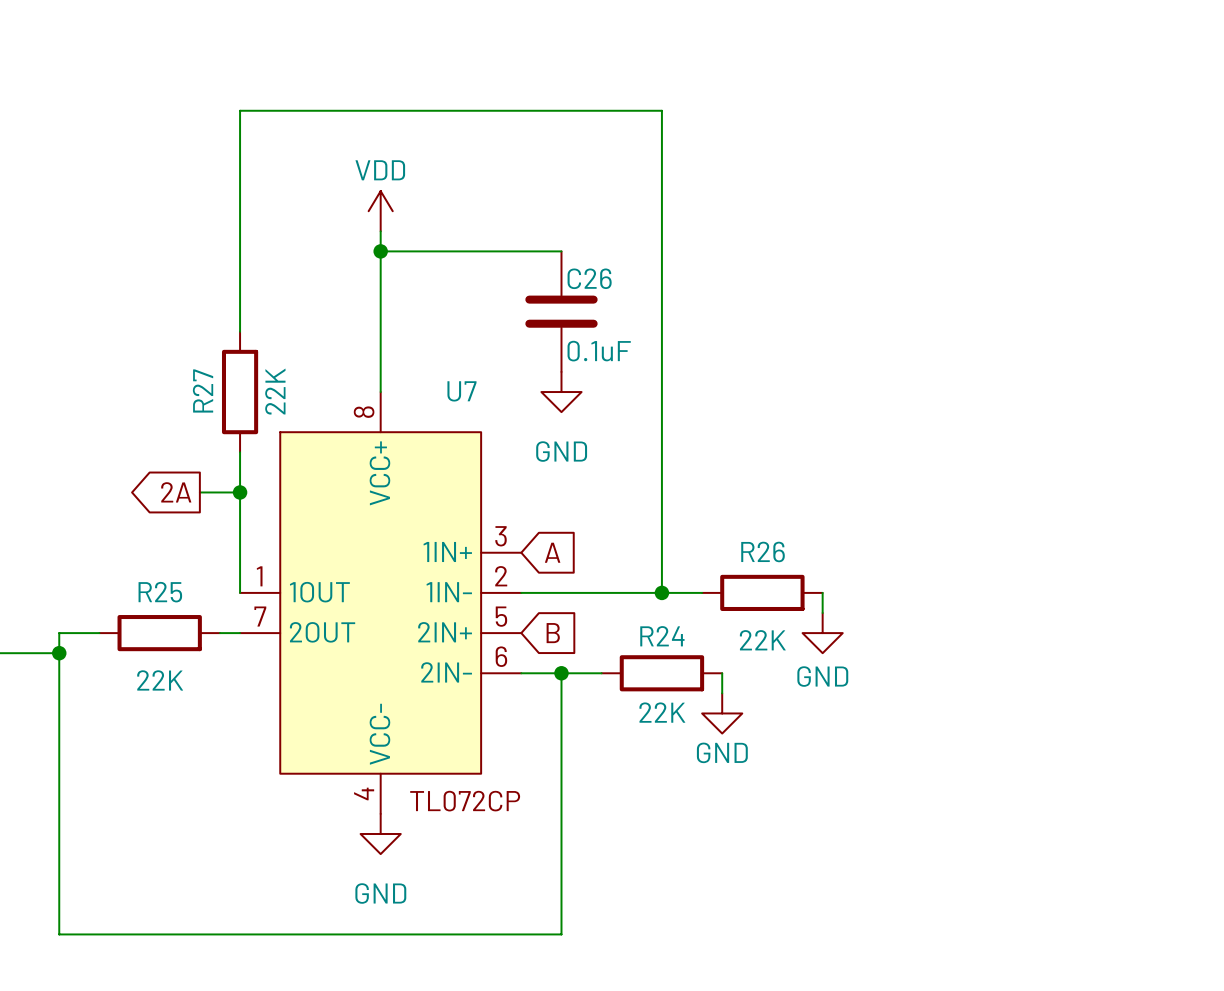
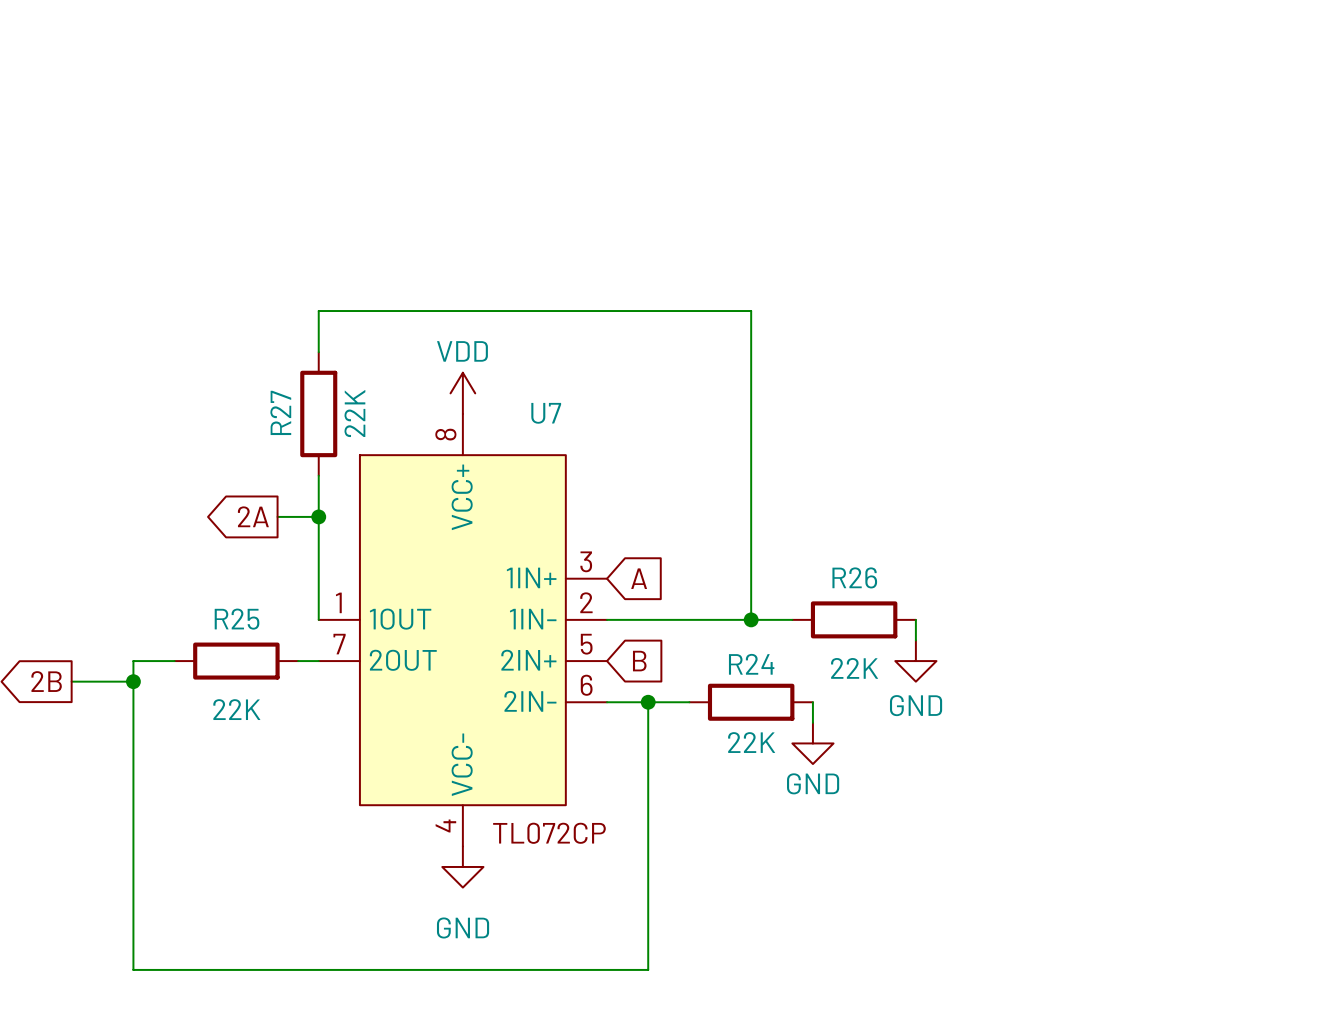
power symbol position: VDD (380, 211) -> VDD (462, 393)
wire: (380, 231) (380, 392) -> none
wire: (380, 251) (561, 251) -> none
junction: (380, 251) -> none
wire: (240, 291) (240, 110) (661, 110) (661, 291) -> (318, 311) (751, 311)
C26: 0.1uF (561, 311) -> none
power symbol: GND (561, 392) -> none

